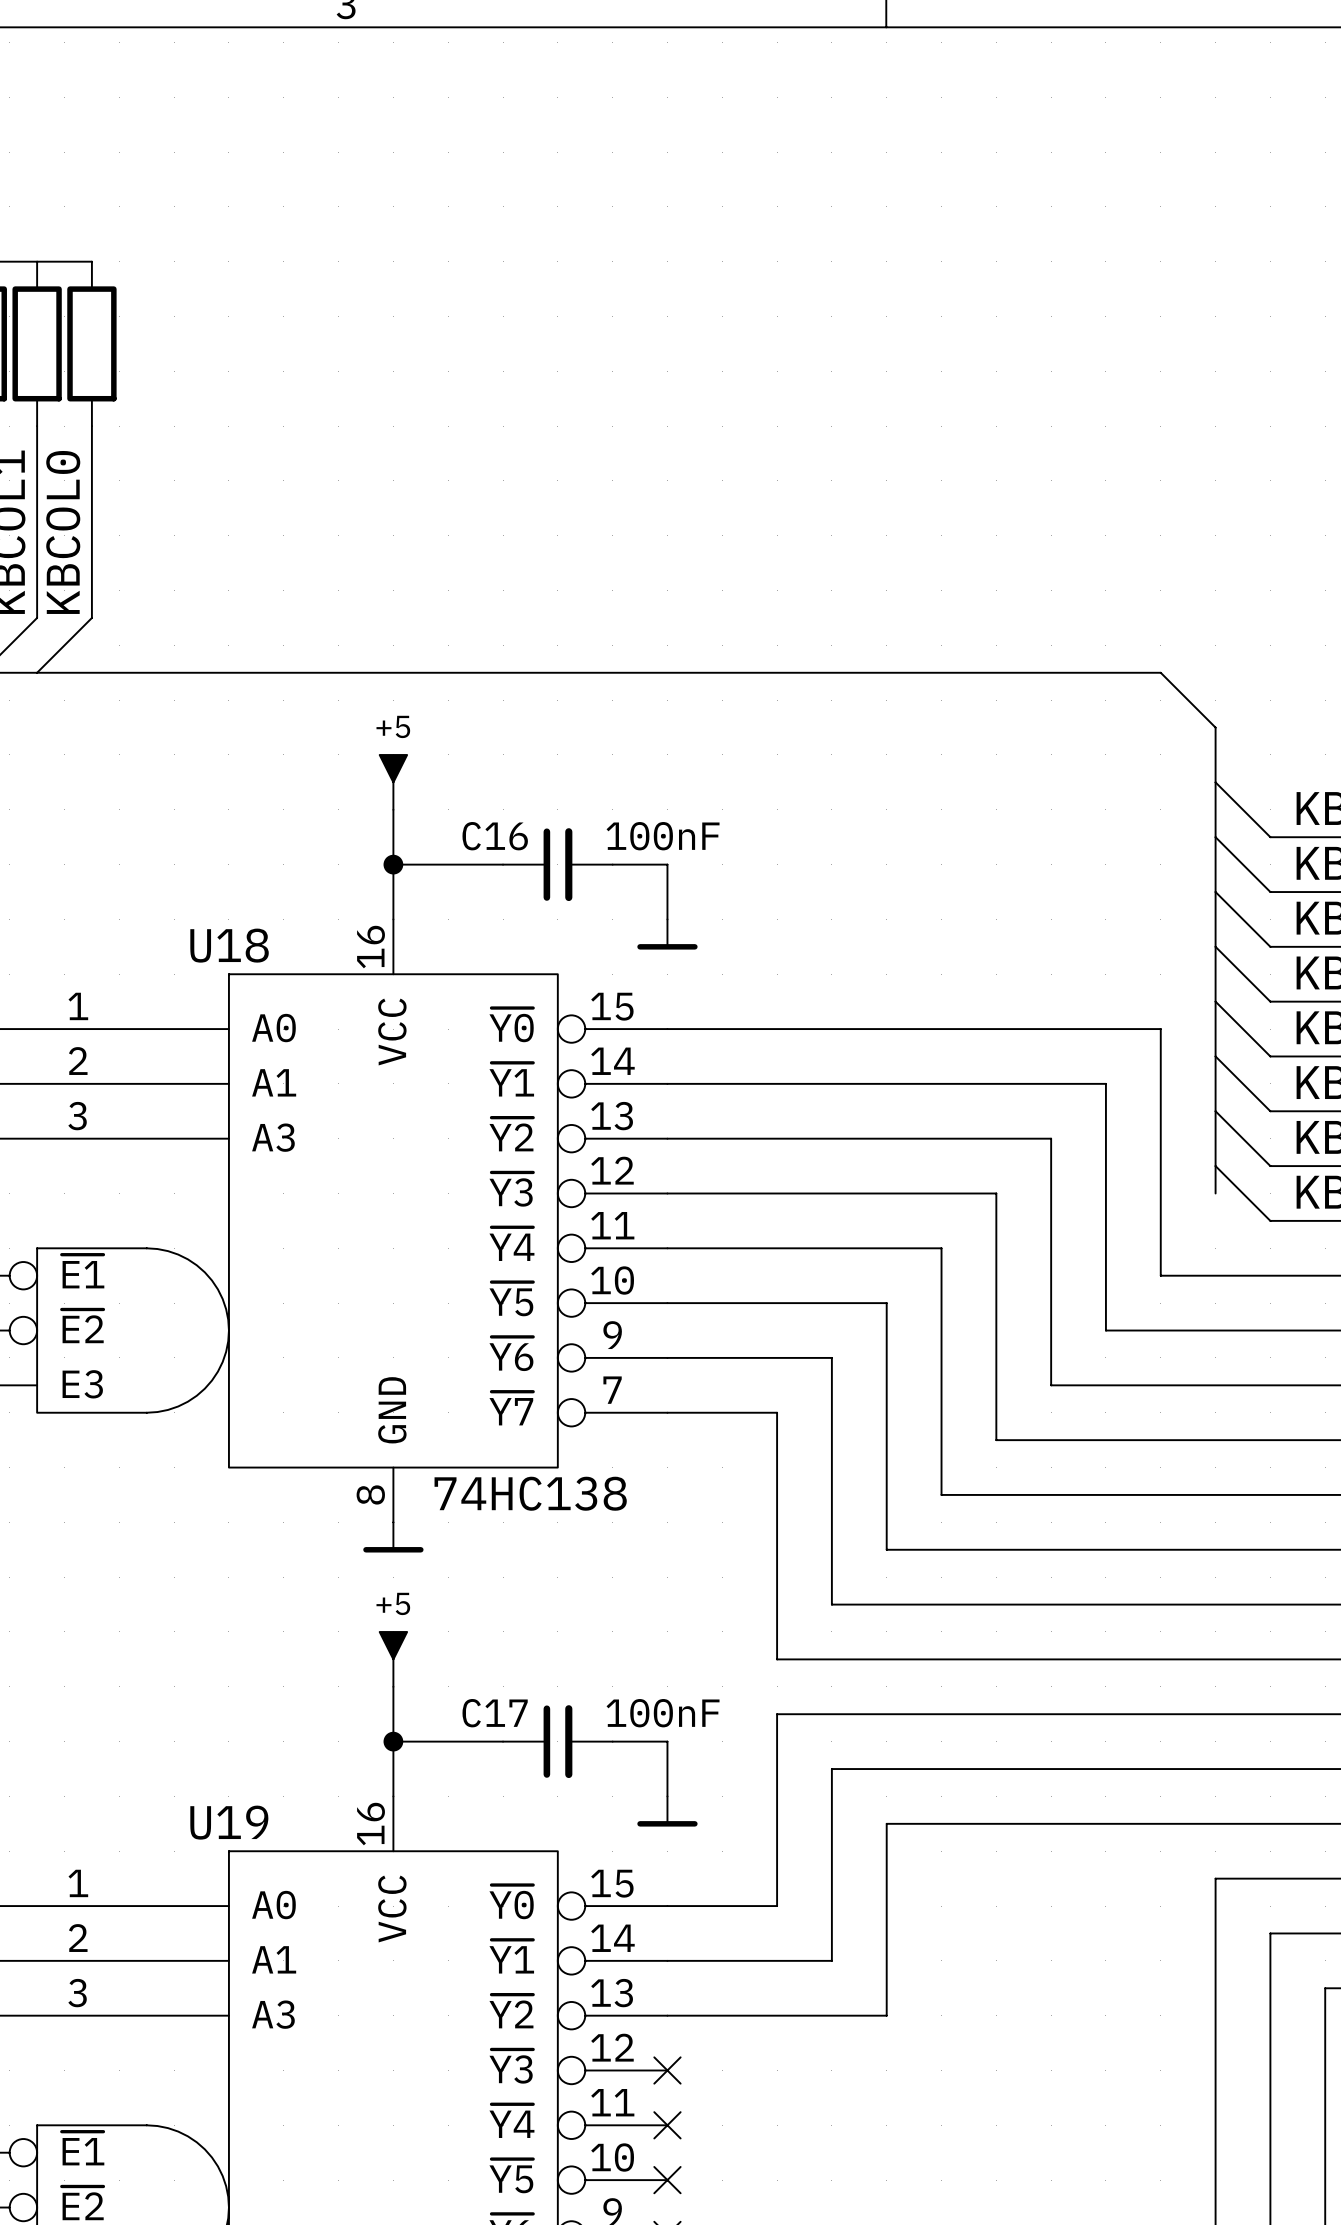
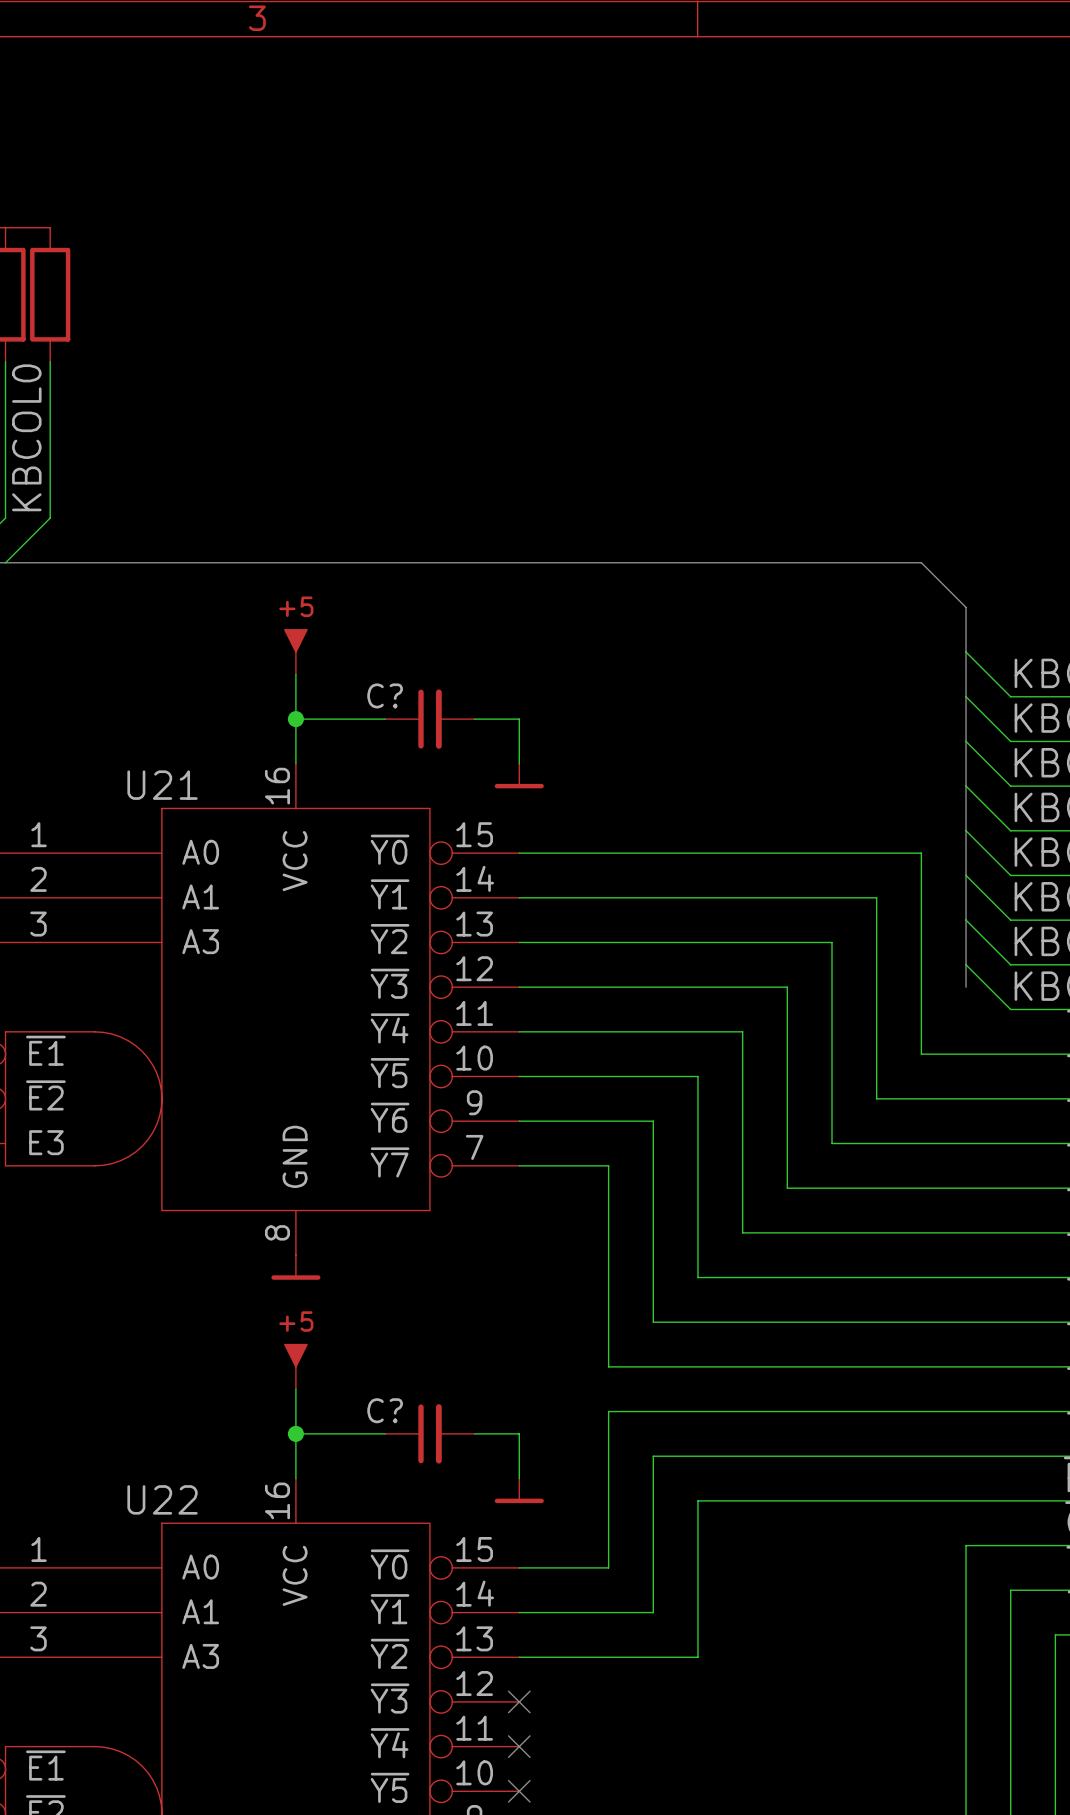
C16 name: C16 (495, 836) -> C? (385, 695)
C16 value: 100nF (663, 836) -> none
U18 name: U18 (229, 945) -> U21 (162, 785)
U18 value: 74HC138 (530, 1493) -> none
C17 name: C17 (495, 1713) -> C? (385, 1410)
C17 value: 100nF (663, 1713) -> none
U19 name: U19 (229, 1822) -> U22 (162, 1499)

